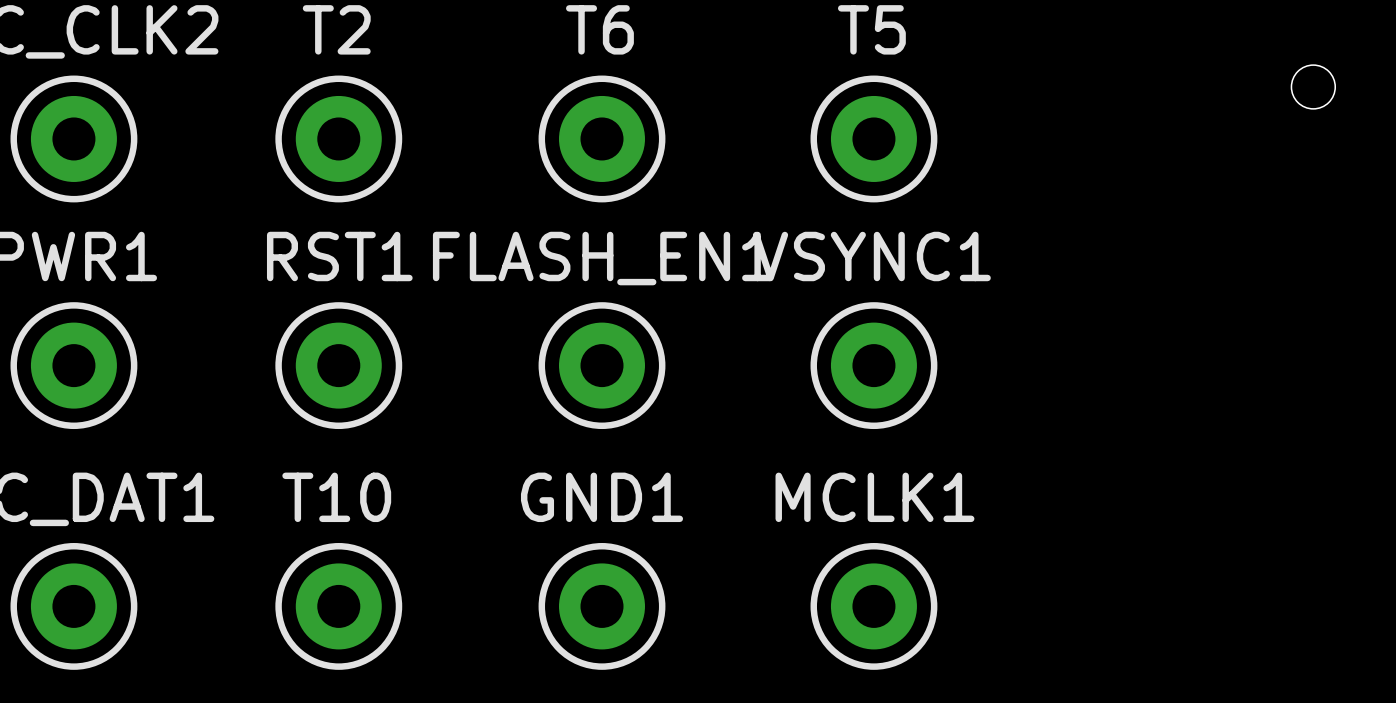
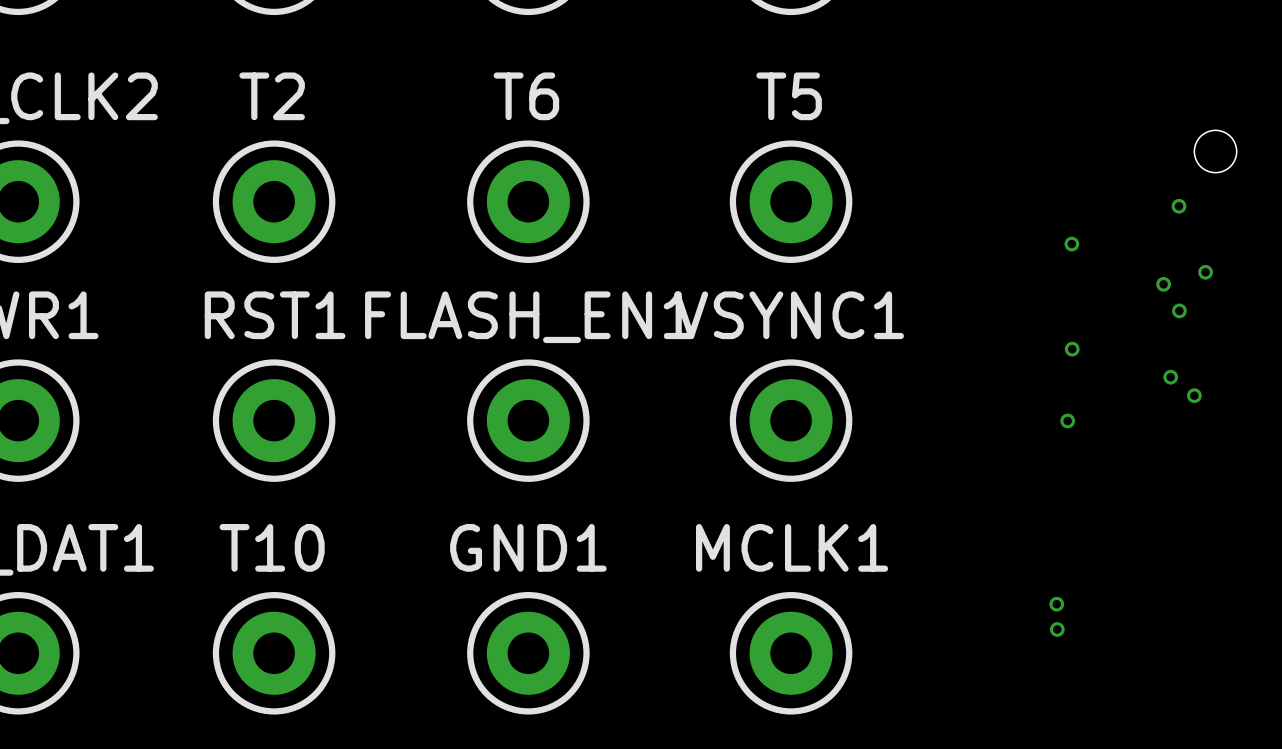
via: none -> (1179, 206)
via: none -> (1071, 244)
via: none -> (1205, 272)
via: none -> (1163, 284)
via: none -> (1179, 310)
via: none -> (1072, 349)
via: none -> (1170, 377)
via: none -> (1194, 395)
via: none -> (1067, 420)
via: none -> (1056, 604)
via: none -> (1057, 629)

